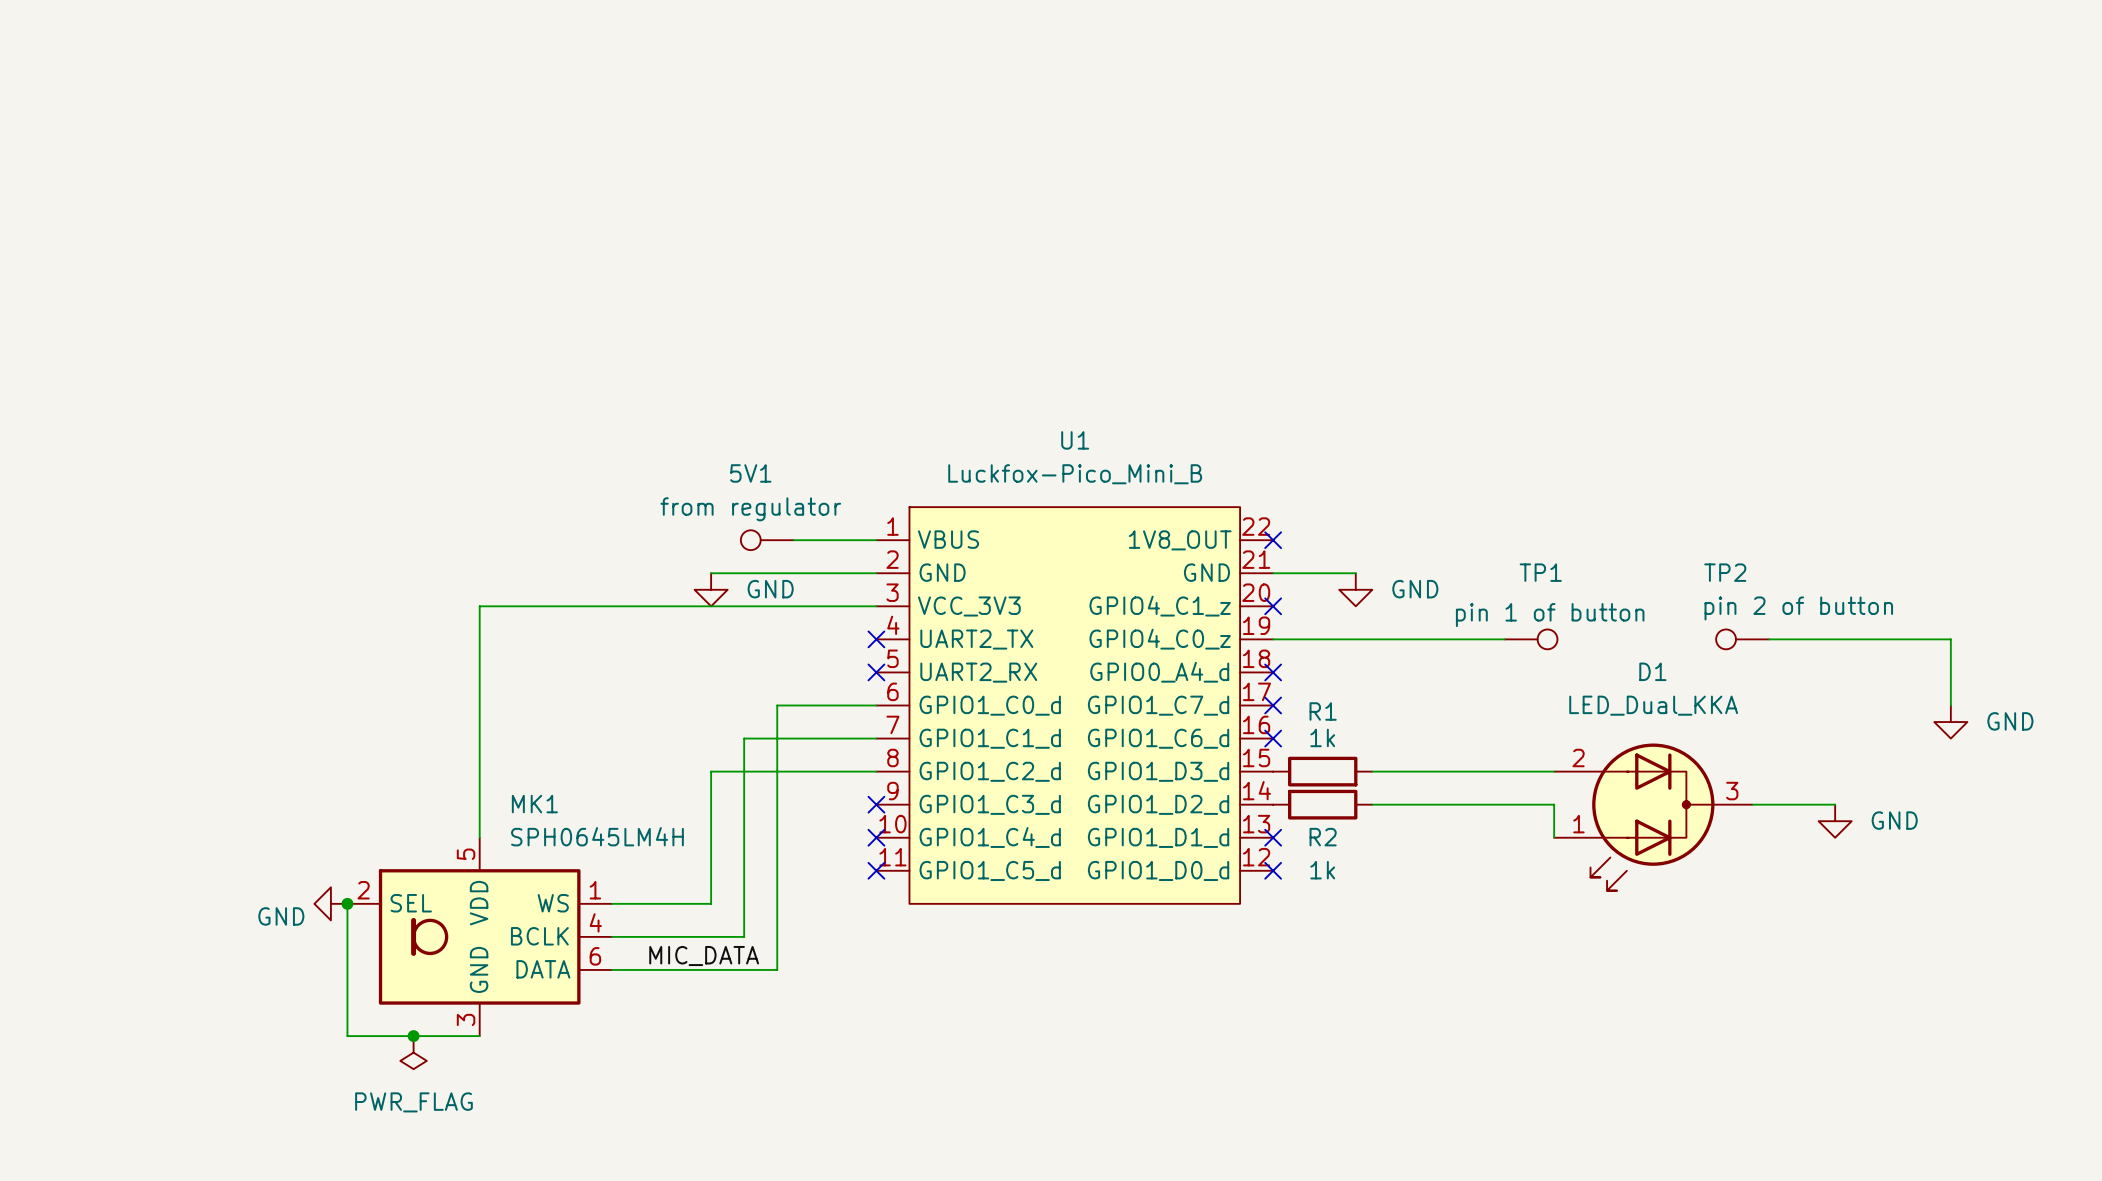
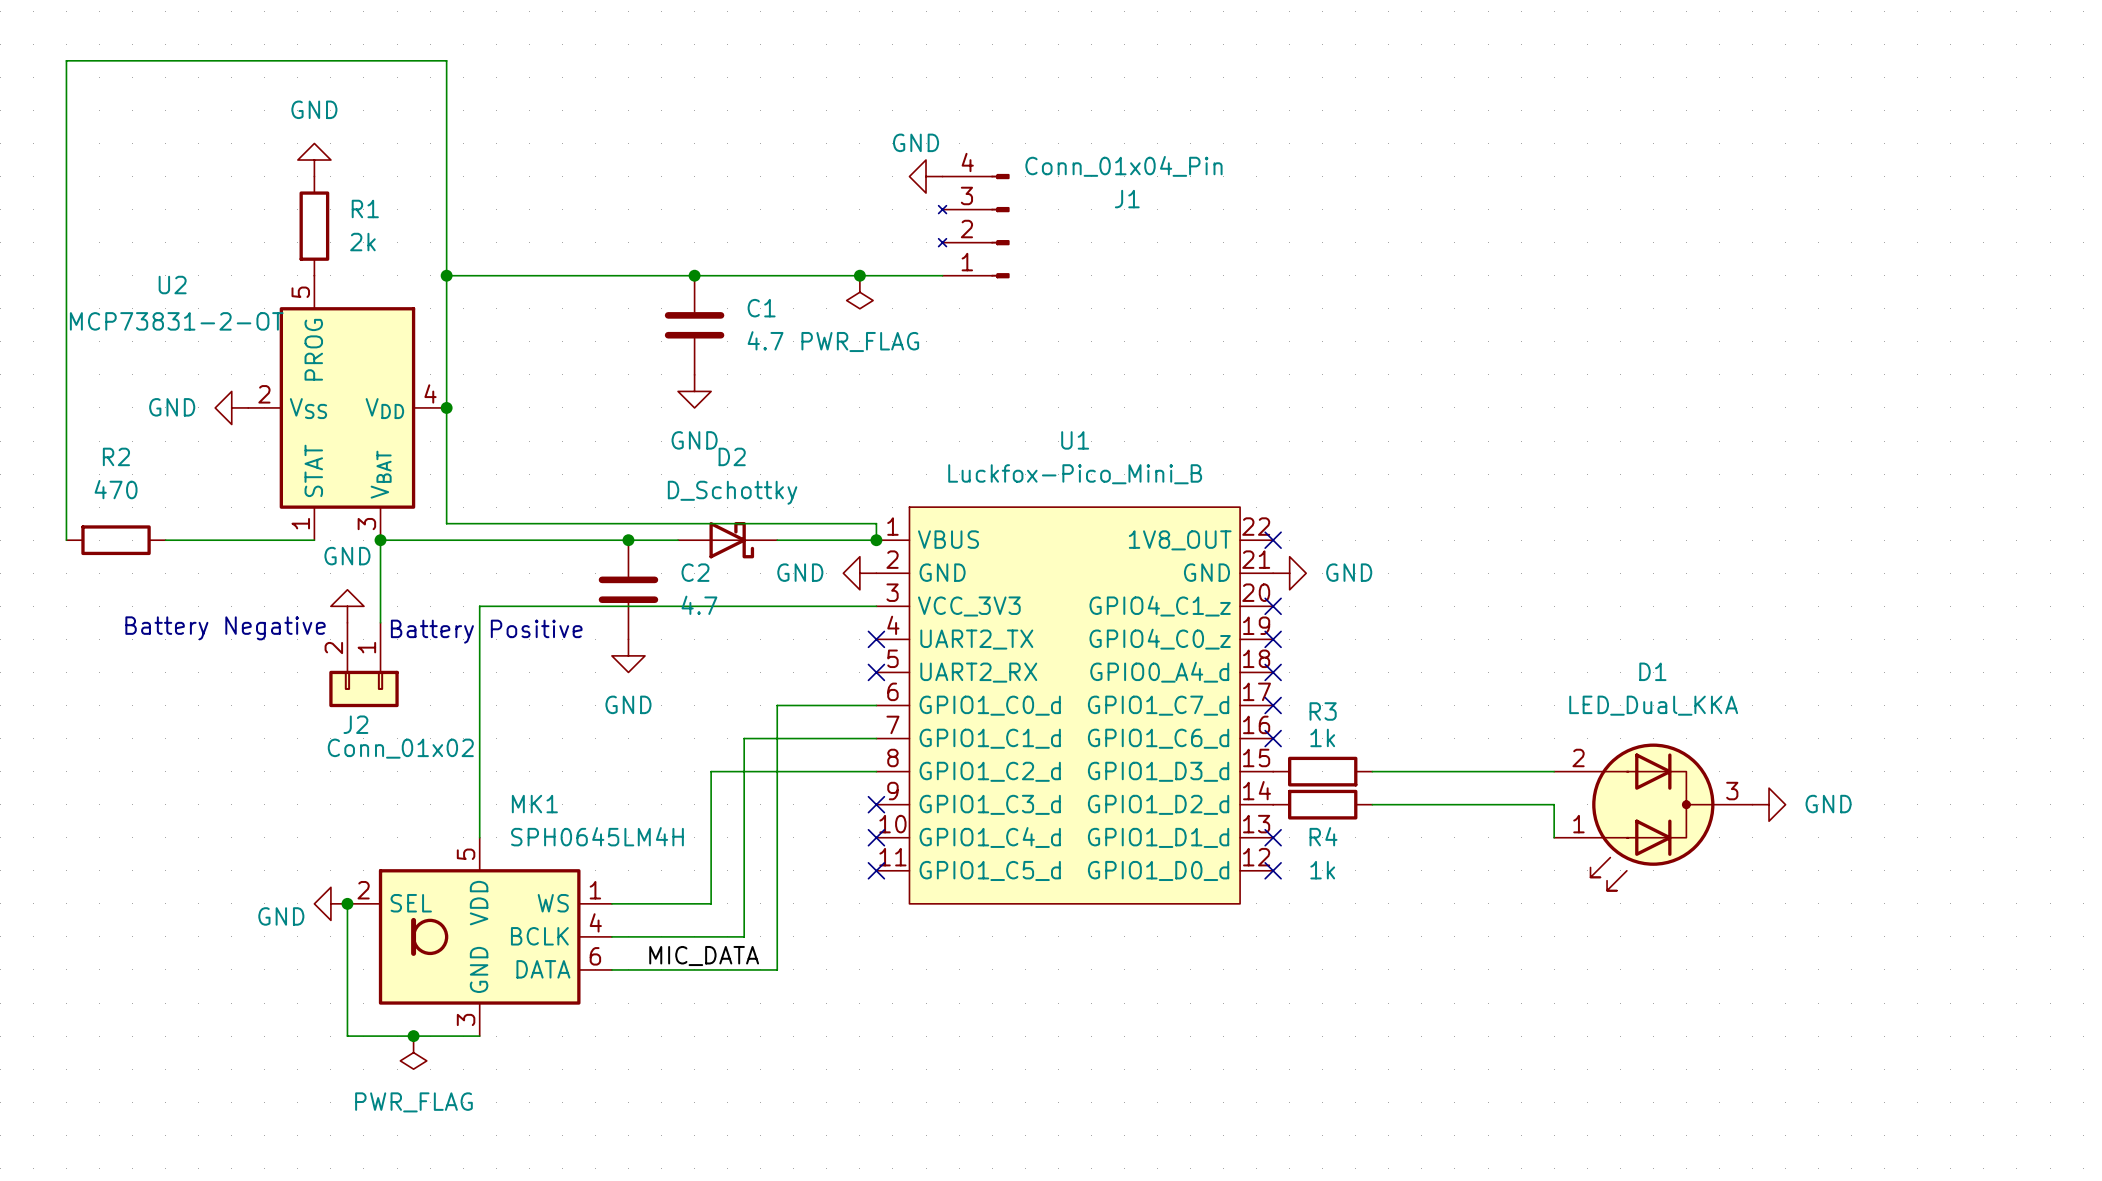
power symbol: none -> GND (314, 160)
power symbol: none -> GND (926, 176)
R1: none -> 2k (314, 226)
J1: none -> Conn_01x04_Pin (974, 226)
wire: none -> (446, 275) (942, 275)
junction: none -> (446, 275)
junction: none -> (694, 275)
junction: none -> (859, 275)
power symbol: none -> PWR_FLAG (859, 292)
C1: none -> 4.7 (694, 325)
power symbol: none -> GND (694, 391)
power symbol: none -> GND (231, 407)
U2: none -> MCP73831-2-OT (347, 407)
junction: none -> (446, 407)
wire: none -> (66, 540) (66, 60) (446, 60) (446, 523) (876, 523) (876, 540)
R2: none -> 470 (116, 540)
wire: none -> (165, 540) (314, 540)
junction: none -> (380, 540)
junction: none -> (628, 540)
wire: none -> (678, 540) (380, 540) (380, 622)
D2: none -> D_Schottky (727, 540)
5V1: from regulator (767, 540) -> none
junction: none -> (876, 540)
wire: (711, 573) (876, 573) -> none
power symbol: none -> GND (859, 573)
wire: (1273, 573) (1355, 573) -> none
C2: none -> 4.7 (628, 589)
power symbol: GND (711, 589) -> none
power symbol rotation: 0° (1355, 589) -> 90° counterclockwise (1289, 573)
power symbol position: GND (1355, 589) -> GND (1289, 573)
power symbol: none -> GND (347, 606)
text: none -> Battery Negative (225, 628)
text: none -> Battery Positive (486, 631)
wire: (1273, 639) (1504, 639) -> none
no-connect mark: none -> (1273, 639)
TP1: pin 1 of button (1531, 639) -> none
TP2: pin 2 of button (1742, 639) -> none
wire: (1769, 639) (1950, 639) (1950, 705) -> none
power symbol: none -> GND (628, 655)
J2: none -> Conn_01x02 (363, 665)
R1 name: R1 (1323, 711) -> R3 (1323, 711)
power symbol: GND (1950, 722) -> none
wire: (1752, 804) (1835, 804) -> none
power symbol rotation: 0° (1835, 821) -> 90° counterclockwise (1769, 804)
power symbol position: GND (1835, 821) -> GND (1769, 804)
R2 name: R2 (1323, 837) -> R4 (1323, 836)

